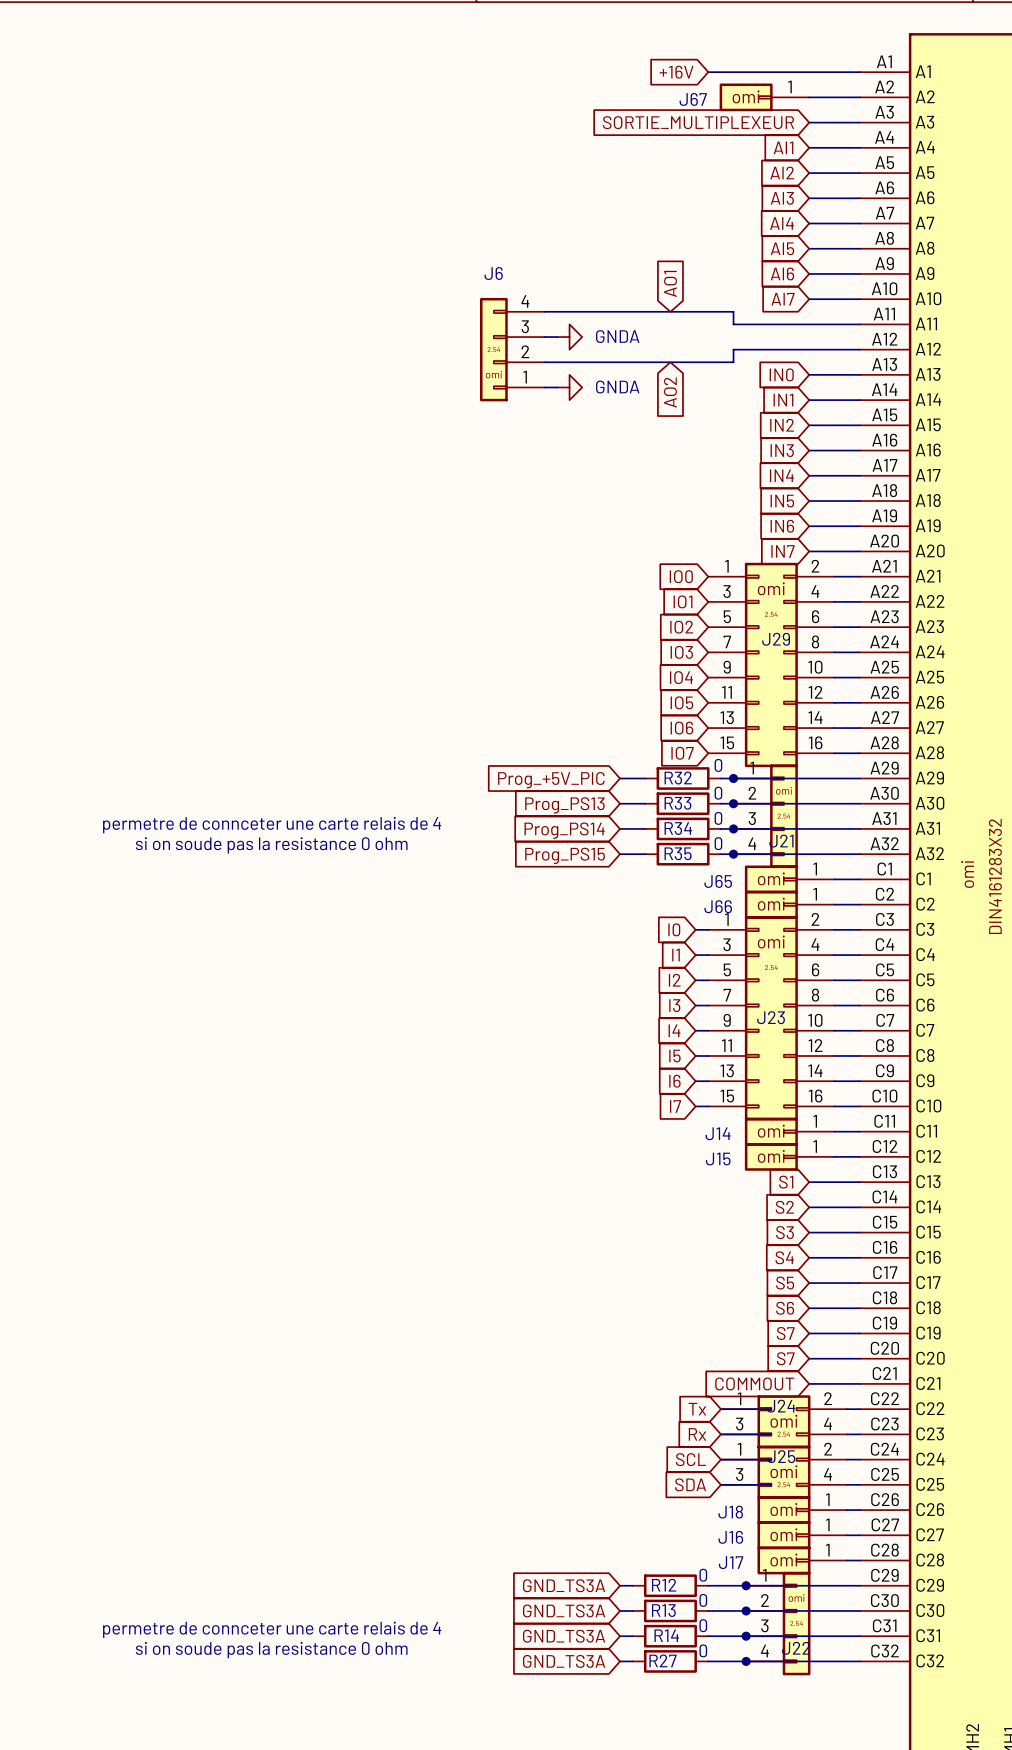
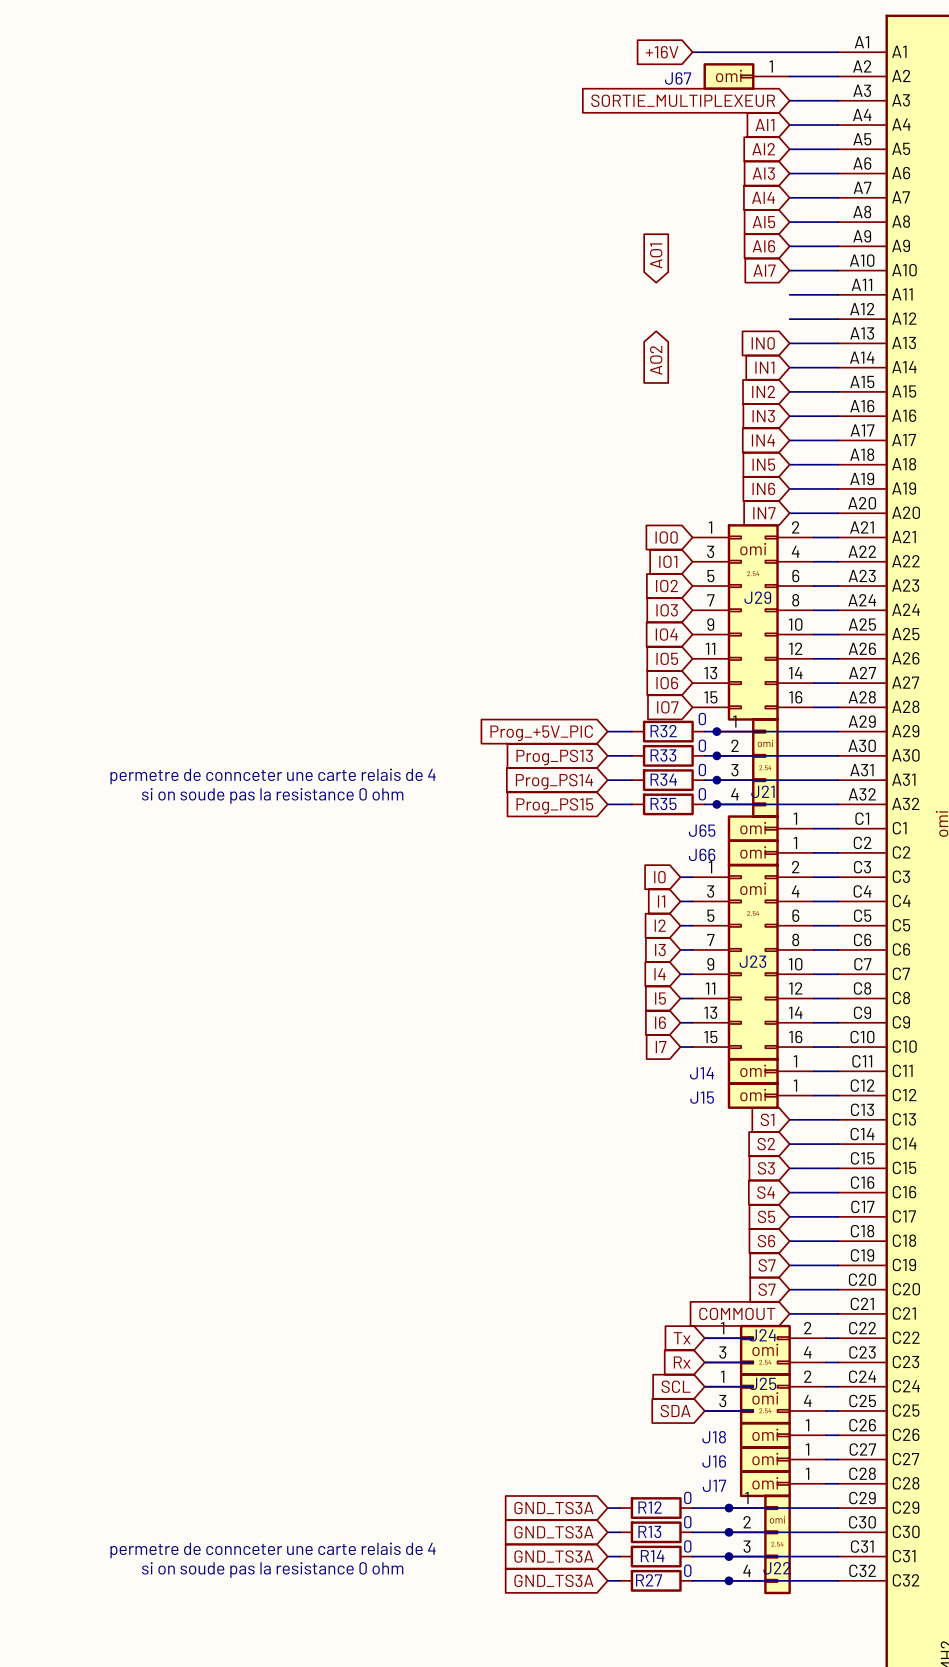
wire: (544, 311) (733, 311) (733, 324) (809, 324) -> none
wire: (544, 337) (556, 337) -> none
power symbol: GNDA (569, 337) -> none
J6: (512, 349) -> none
wire: (809, 349) (733, 349) (733, 362) (544, 362) -> none
wire: (544, 387) (556, 387) -> none
power symbol: GNDA (569, 387) -> none

